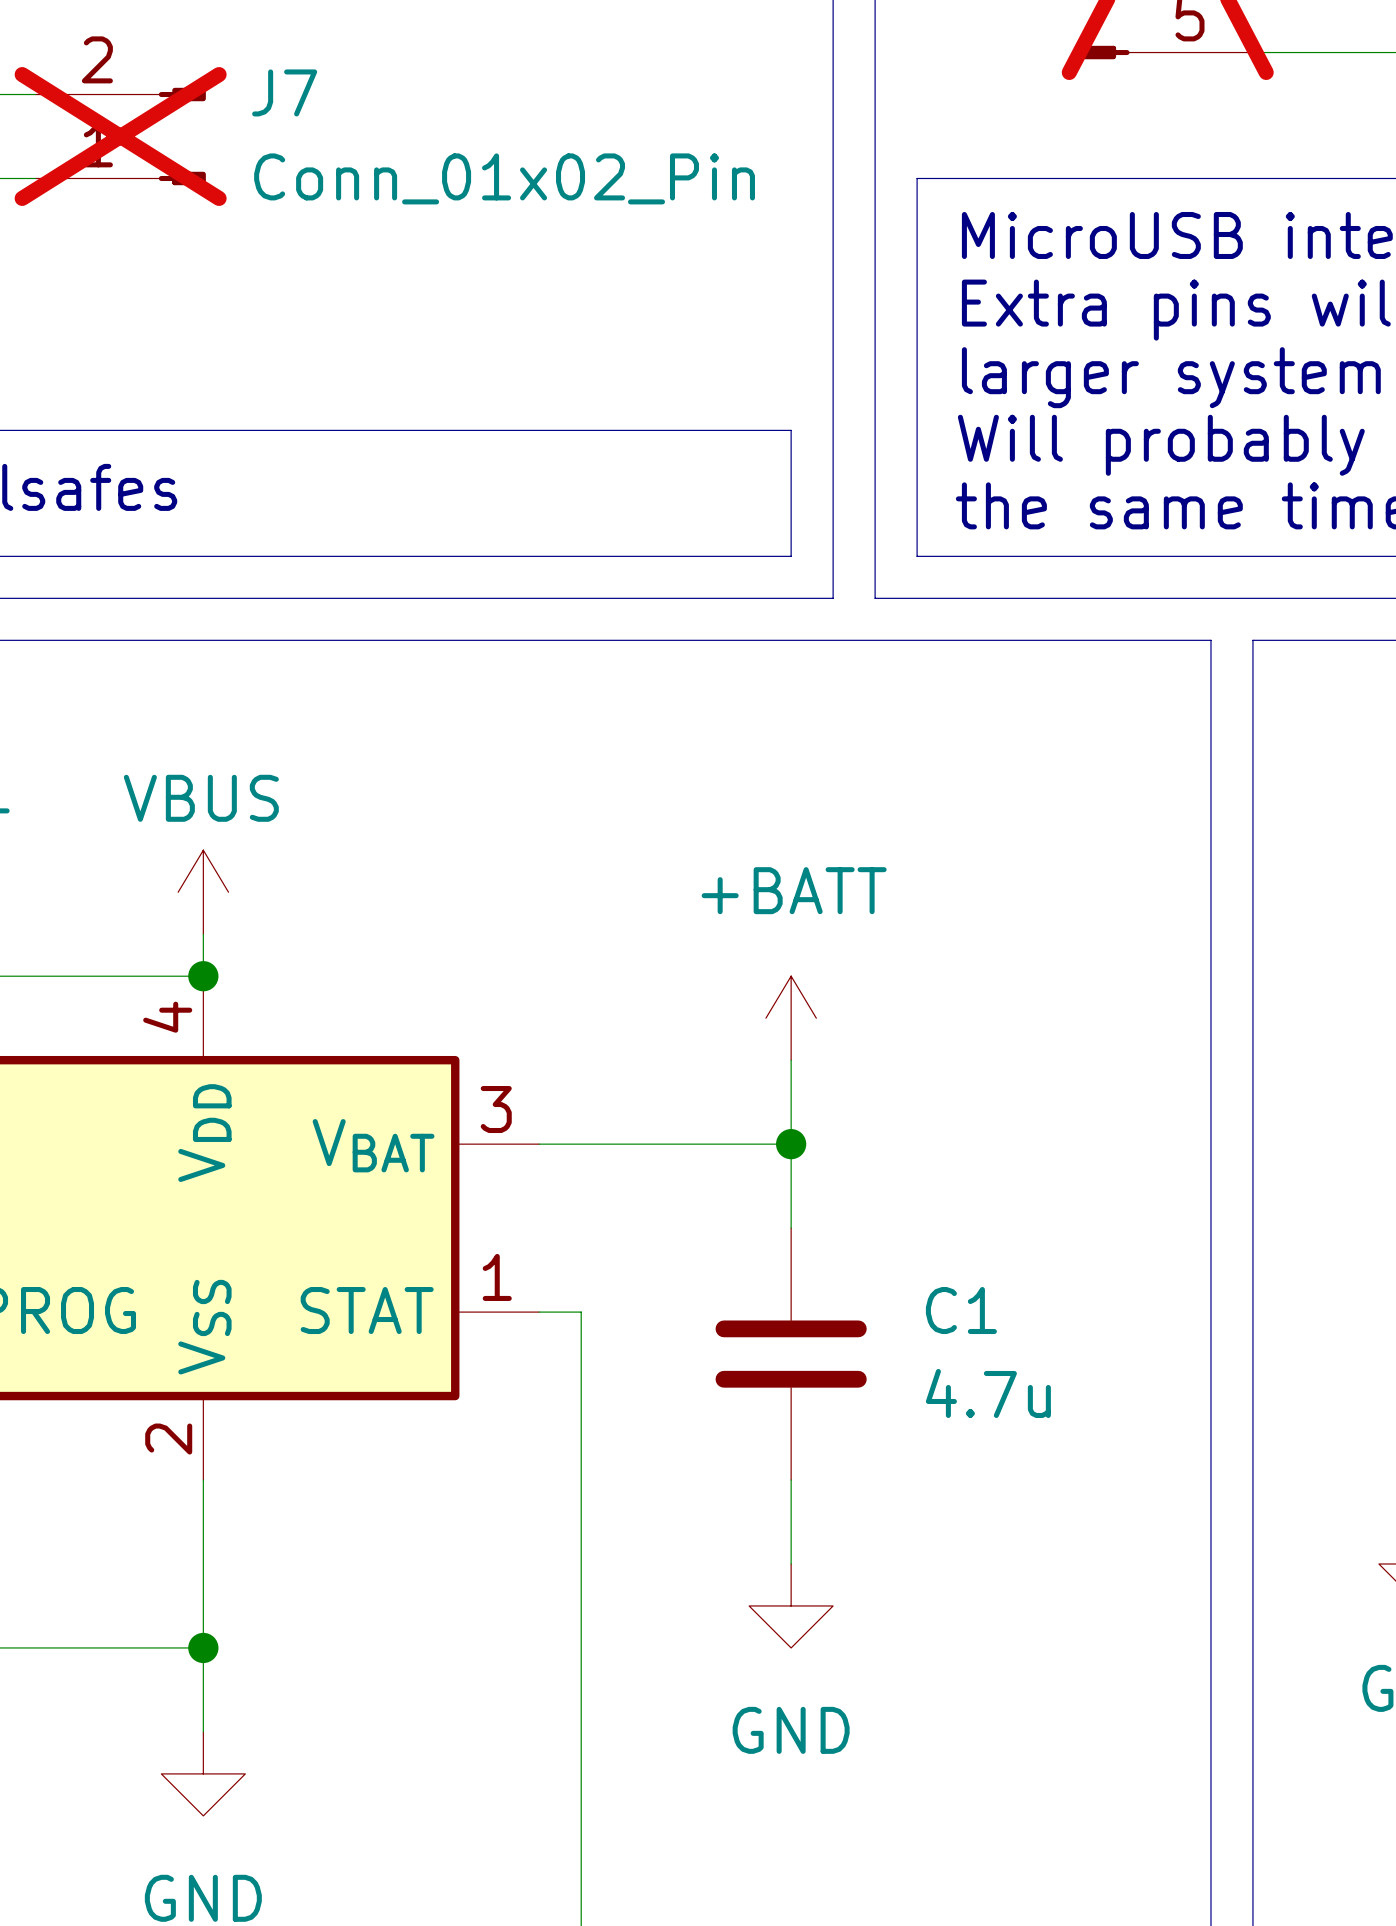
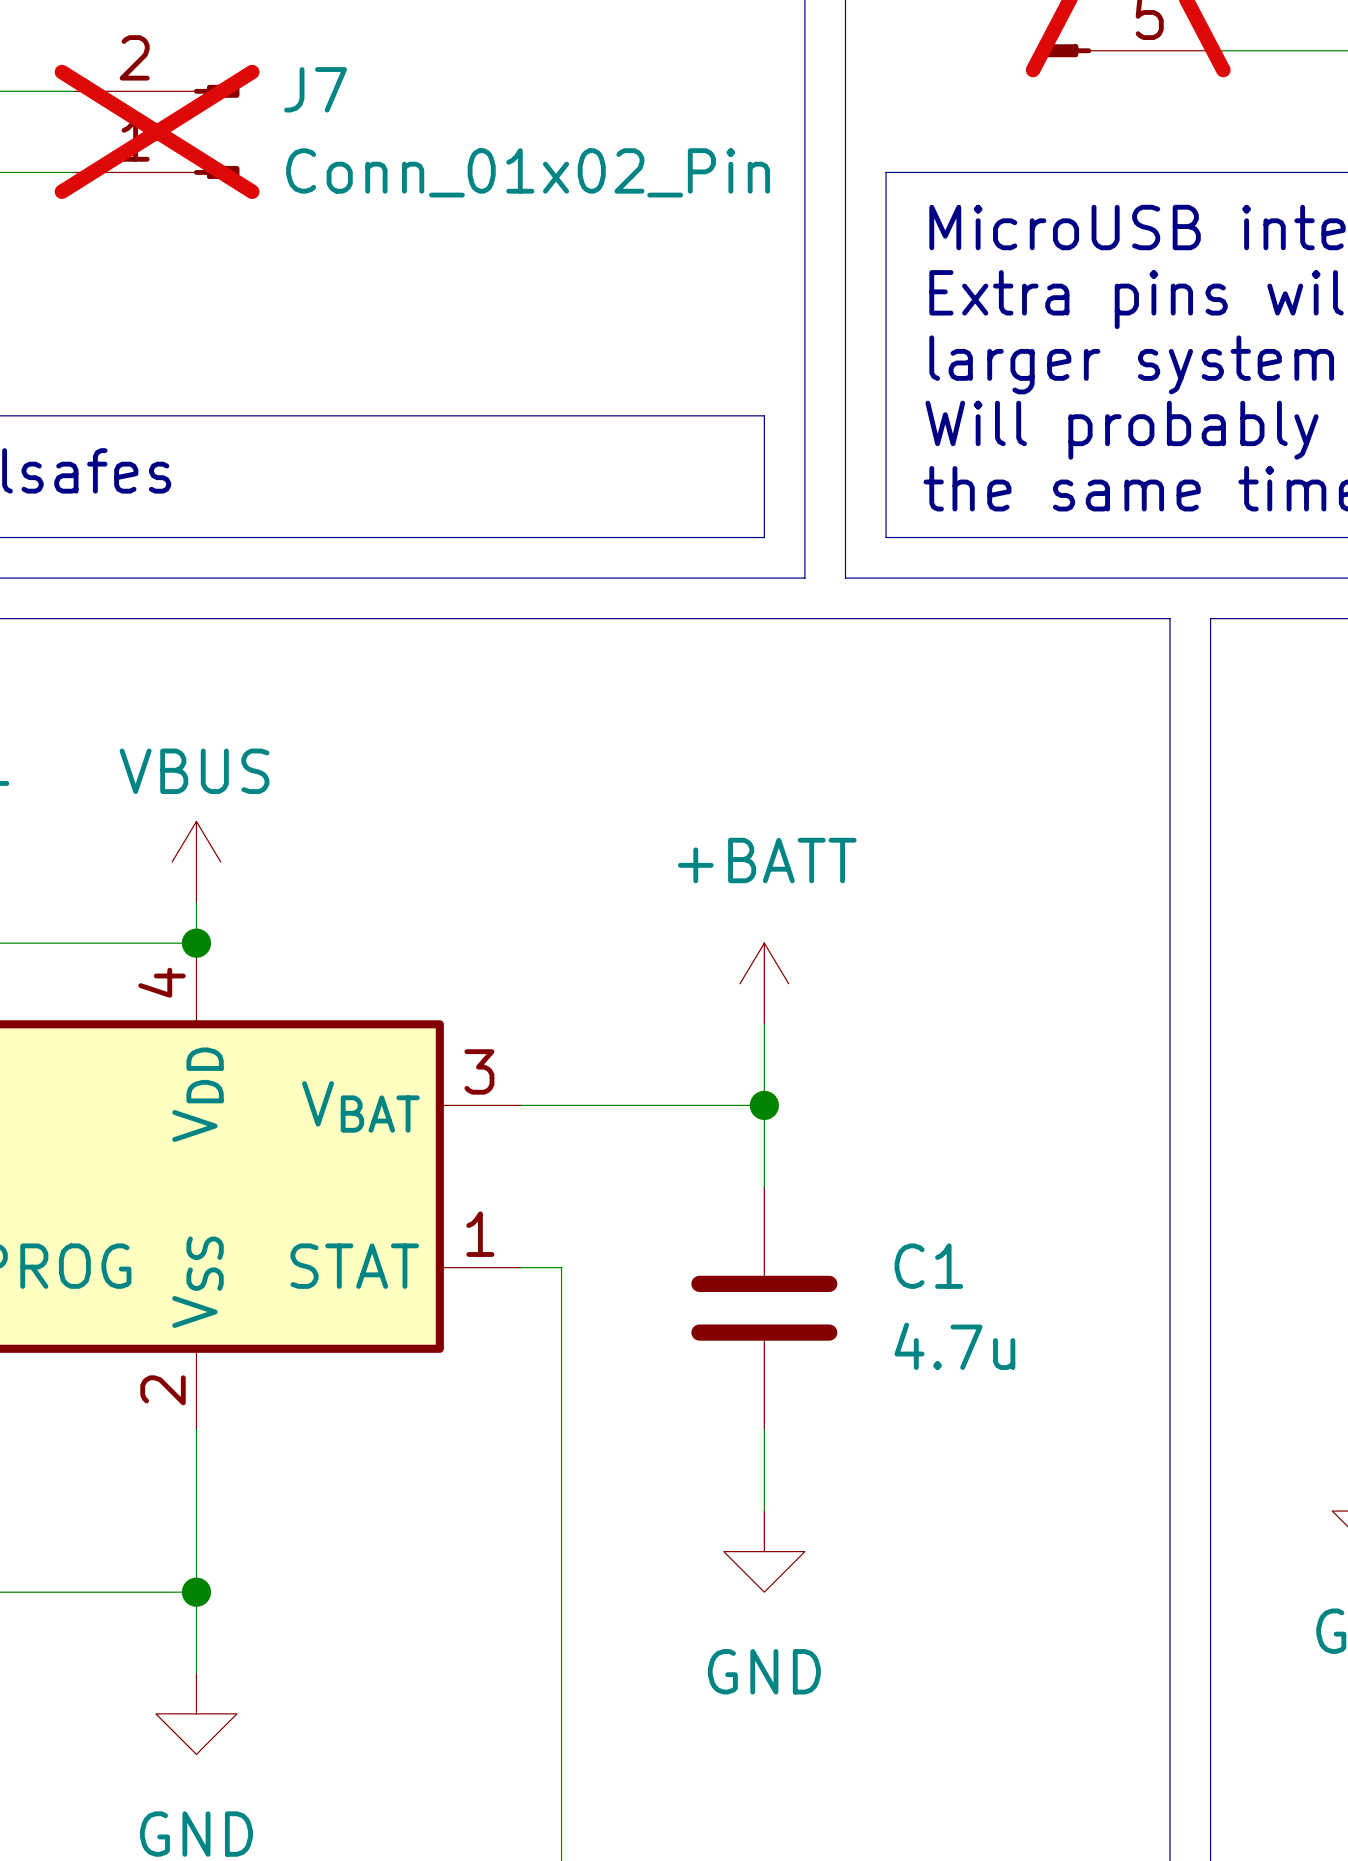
J7 position: (120, 136) -> (157, 131)

